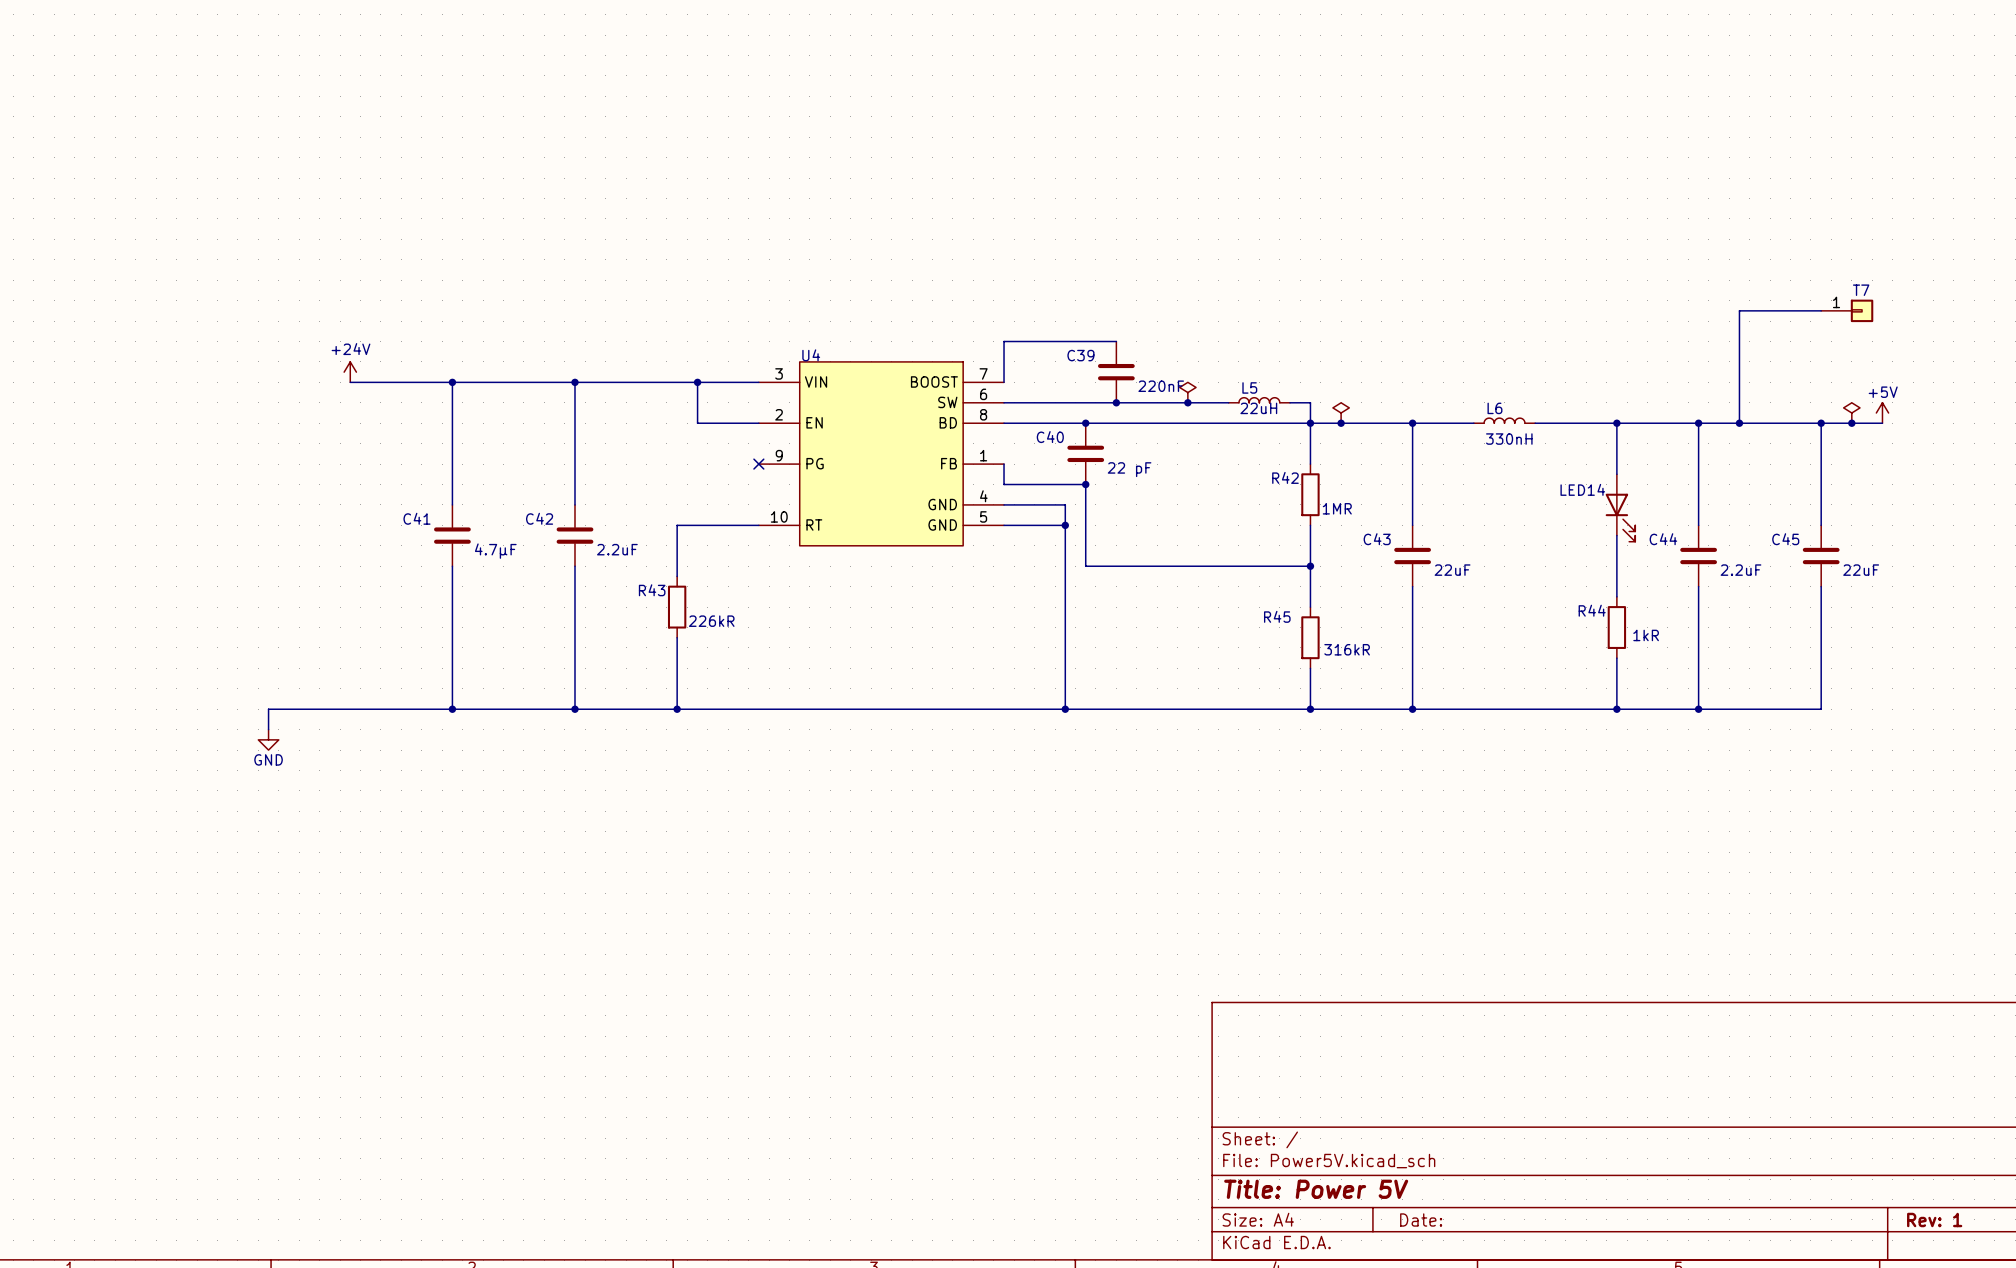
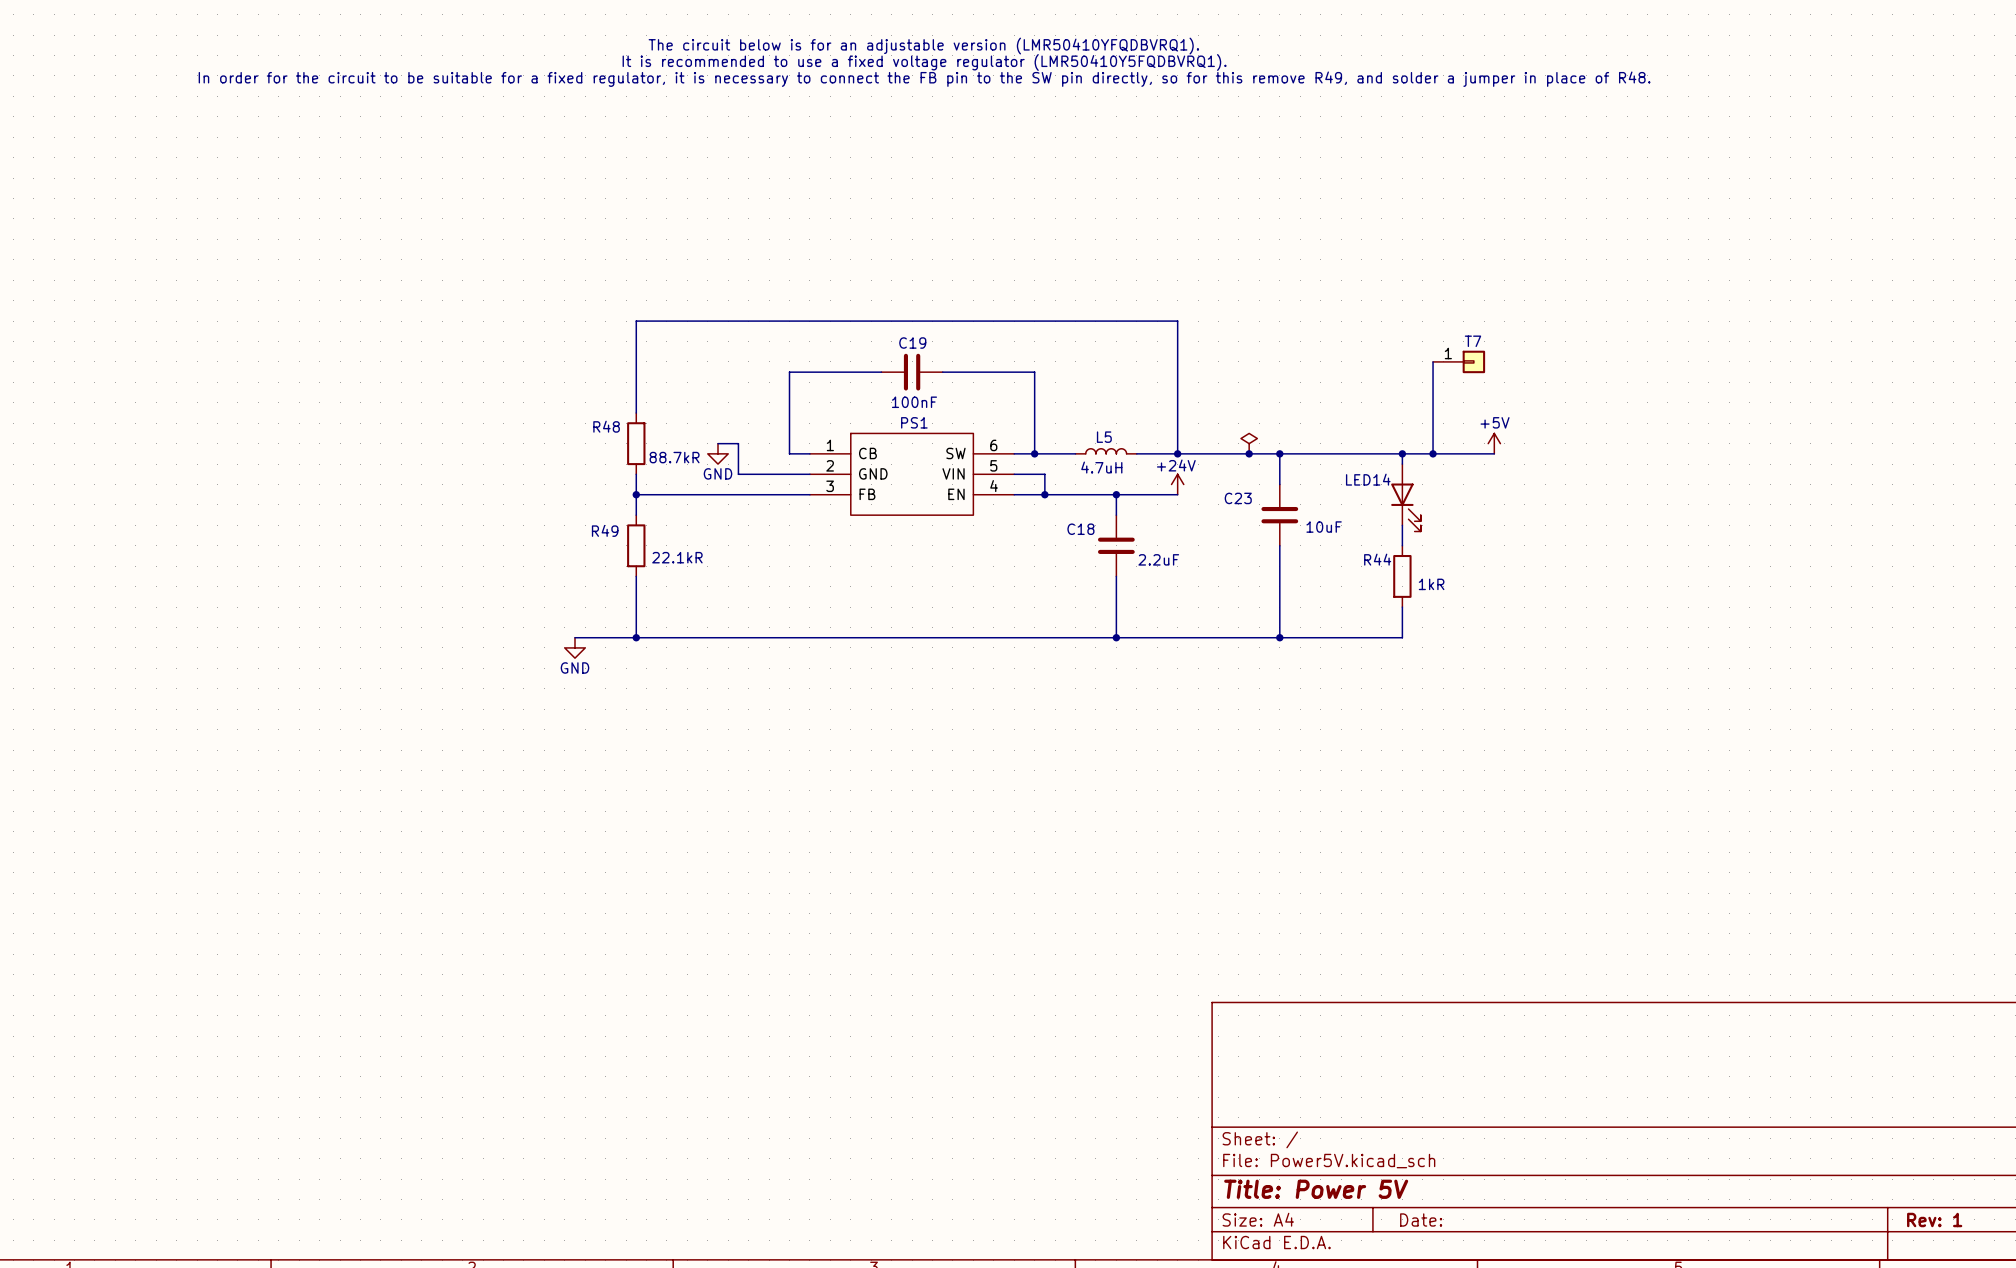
text: none -> The circuit below is for an adjustable version (LMR50410YFQDBVRQ1). (923, 46)
text: none -> It is recommended to use a fixed voltage regulator (LMR50410Y5FQDBVRQ1). (924, 62)
text: none -> In order for the circuit to be suitable for a fixed regulator, it is necessary to connect the FB pin to the SW pin directly, so for this remove R49, and solder a jumper in place of R48. (924, 79)
wire: (1821, 310) (1739, 310) (1739, 423) -> none
T7 position: (1847, 310) -> (1459, 361)
wire: (1116, 341) (1004, 341) (1004, 382) -> none
wire: none -> (1433, 361) (1433, 453)
power symbol: +24V (350, 372) -> none
wire: none -> (881, 372) (789, 372) (789, 453) (809, 453)
C19: none -> (912, 372)
wire: none -> (942, 372) (1034, 372) (1034, 453)
C39: (1116, 372) -> none
wire: (350, 382) (758, 382) -> none
wire: (452, 382) (452, 504) -> none
junction: (452, 382) -> none
wire: (574, 382) (574, 504) -> none
junction: (574, 382) -> none
wire: (697, 382) (697, 423) (758, 423) -> none
junction: (697, 382) -> none
L5 name position: L5 (1249, 387) -> L5 (1104, 437)
power symbol: (1187, 392) -> none
L5 position: (1259, 400) -> (1106, 451)
wire: (1004, 402) (1228, 402) -> none
junction: (1116, 402) -> none
junction: (1187, 402) -> none
wire: (1290, 402) (1310, 402) (1310, 464) -> none
L5 text: 22uH (1258, 408) -> none
wire: none -> (636, 413) (636, 321) (1177, 321) (1177, 453)
power symbol: (1341, 413) -> none
power symbol: (1851, 413) -> none
power symbol: +5V (1882, 413) -> none
L6: (1504, 420) -> none
wire: (1004, 423) (1473, 423) -> none
junction: (1085, 423) -> none
junction: (1310, 423) -> none
junction: (1341, 423) -> none
wire: (1412, 423) (1412, 525) -> none
junction: (1412, 423) -> none
wire: (1535, 423) (1882, 423) -> none
wire: (1616, 423) (1616, 474) -> none
junction: (1616, 423) -> none
wire: (1698, 423) (1698, 525) -> none
junction: (1698, 423) -> none
junction: (1739, 423) -> none
wire: (1821, 423) (1821, 525) -> none
junction: (1821, 423) -> none
junction: (1851, 423) -> none
R48: none -> 88.7kR (636, 443)
wire: none -> (718, 443) (738, 443) (738, 474) (809, 474)
power symbol: none -> (1249, 443)
power symbol: none -> +5V (1494, 443)
power symbol: none -> GND (718, 453)
U4: (881, 453) -> none
junction: none -> (1034, 453)
C40: (1085, 453) -> none
wire: none -> (1136, 453) (1494, 453)
junction: none -> (1177, 453)
junction: none -> (1249, 453)
wire: none -> (1279, 453) (1279, 484)
junction: none -> (1279, 453)
wire: none -> (1402, 453) (1402, 464)
junction: none -> (1402, 453)
junction: none -> (1433, 453)
no-connect mark: (758, 464) -> none
wire: (1004, 464) (1004, 484) (1085, 484) (1085, 566) (1310, 566) -> none
L5 value: none -> 4.7uH (1101, 467)
wire: none -> (636, 474) (636, 515)
PS1: none -> (912, 474)
wire: none -> (1014, 474) (1044, 474) (1044, 494)
junction: (1085, 484) -> none
power symbol: none -> +24V (1177, 484)
wire: none -> (636, 494) (809, 494)
junction: none -> (636, 494)
wire: none -> (1014, 494) (1177, 494)
junction: none -> (1044, 494)
wire: none -> (1116, 494) (1116, 515)
junction: none -> (1116, 494)
R42: (1310, 494) -> none
wire: (1004, 504) (1065, 504) (1065, 709) -> none
LED14 position: (1620, 508) -> (1405, 497)
C23: none -> 10uF (1279, 515)
wire: (758, 525) (677, 525) (677, 576) -> none
wire: (1004, 525) (1065, 525) -> (1014, 453) (1075, 453)
junction: (1065, 525) -> none
wire: (1310, 525) (1310, 607) -> none
wire: none -> (1402, 525) (1402, 545)
C41: (452, 535) -> none
C42: (574, 535) -> none
wire: (1616, 535) (1616, 596) -> none
R49: none -> 22.1kR (636, 545)
C18: none -> (1116, 545)
wire: none -> (1279, 545) (1279, 637)
C43: (1412, 556) -> none
C44: (1698, 556) -> none
C45: (1821, 556) -> none
wire: (452, 566) (452, 709) -> none
wire: (574, 566) (574, 709) -> none
junction: (1310, 566) -> none
wire: none -> (636, 576) (636, 637)
wire: none -> (1116, 576) (1116, 637)
wire: (1412, 586) (1412, 709) -> none
wire: (1698, 586) (1698, 709) -> none
wire: (1821, 586) (1821, 709) (268, 709) (268, 729) -> none
R43: (677, 607) -> none
wire: none -> (1402, 607) (1402, 637) (574, 637)
R44 position: (1616, 627) -> (1402, 576)
junction: none -> (636, 637)
wire: (677, 637) (677, 709) -> none
junction: none -> (1116, 637)
junction: none -> (1279, 637)
R45: (1310, 637) -> none
power symbol: none -> GND (574, 647)
wire: (1616, 658) (1616, 709) -> none
wire: (1310, 668) (1310, 709) -> none
junction: (452, 709) -> none
junction: (574, 709) -> none
junction: (677, 709) -> none
junction: (1065, 709) -> none
junction: (1310, 709) -> none
junction: (1412, 709) -> none
junction: (1616, 709) -> none
junction: (1698, 709) -> none
power symbol: GND (268, 739) -> none

